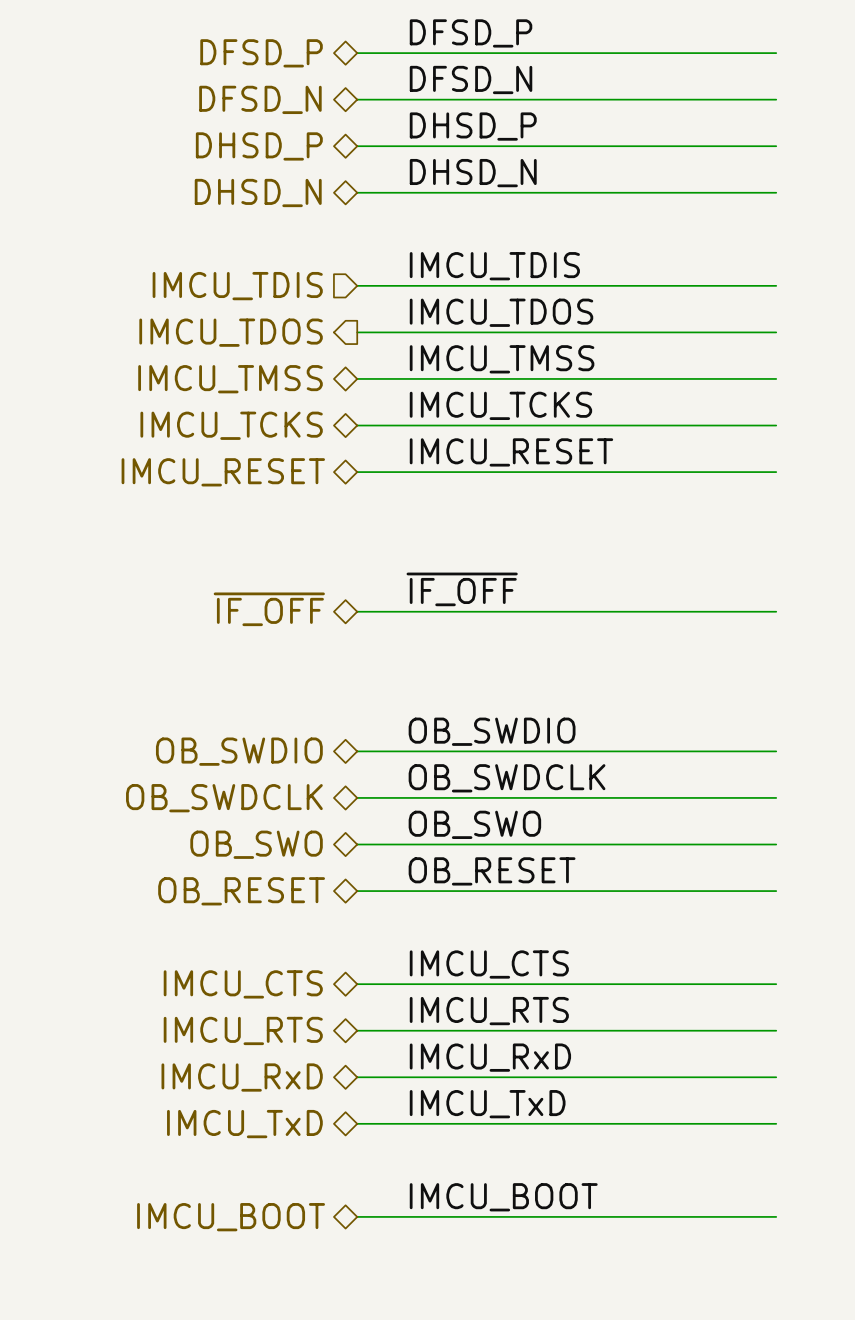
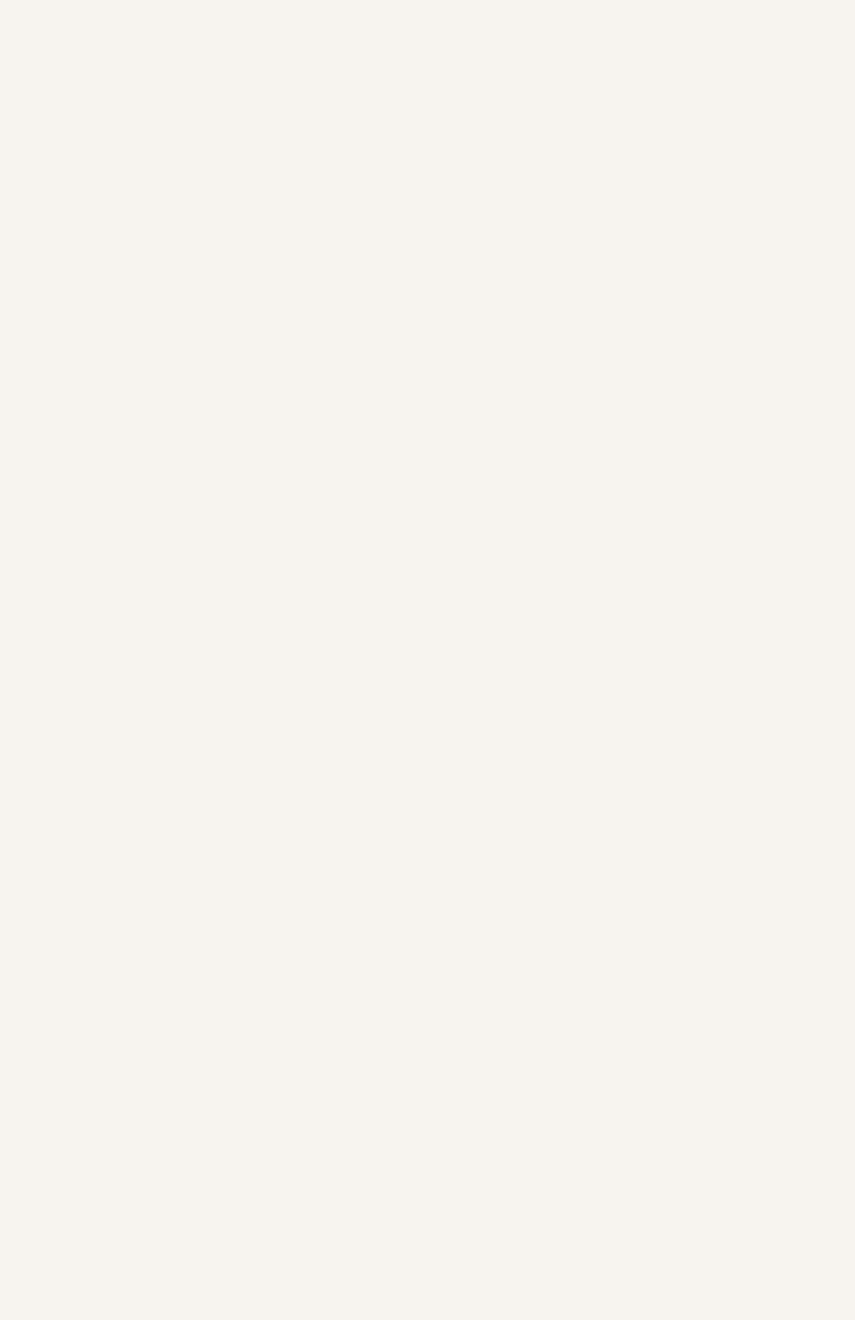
label: DFSD_P (471, 33) -> none
hierarchical label: DFSD_P (261, 53) -> none
wire: (357, 53) (776, 53) -> none
label: DFSD_N (471, 79) -> none
hierarchical label: DFSD_N (260, 99) -> none
wire: (357, 99) (776, 99) -> none
label: DHSD_P (473, 126) -> none
hierarchical label: DHSD_P (259, 146) -> none
wire: (357, 146) (776, 146) -> none
label: DHSD_N (473, 173) -> none
hierarchical label: DHSD_N (258, 192) -> none
wire: (357, 192) (776, 192) -> none
label: IMCU_TDIS (494, 266) -> none
wire: (357, 285) (776, 285) -> none
hierarchical label: IMCU_TDIS (237, 286) -> none
label: IMCU_TDOS (501, 312) -> none
hierarchical label: IMCU_TDOS (231, 332) -> none
wire: (357, 332) (776, 332) -> none
label: IMCU_TMSS (502, 359) -> none
wire: (357, 378) (776, 378) -> none
hierarchical label: IMCU_TMSS (230, 379) -> none
label: IMCU_TCKS (500, 405) -> none
hierarchical label: IMCU_TCKS (231, 425) -> none
wire: (357, 425) (776, 425) -> none
label: IMCU_RESET (511, 452) -> none
hierarchical label: IMCU_RESET (223, 472) -> none
wire: (357, 472) (776, 472) -> none
label: ~{IF_OFF} (462, 589) -> none
hierarchical label: ~{IF_OFF} (269, 609) -> none
wire: (357, 611) (776, 611) -> none
label: OB_SWDIO (492, 731) -> none
hierarchical label: OB_SWDIO (239, 751) -> none
wire: (357, 751) (776, 751) -> none
label: OB_SWDCLK (507, 778) -> none
wire: (357, 797) (776, 797) -> none
hierarchical label: OB_SWDCLK (224, 798) -> none
label: OB_SWO (474, 824) -> none
hierarchical label: OB_SWO (256, 844) -> none
wire: (357, 844) (776, 844) -> none
label: OB_RESET (492, 871) -> none
hierarchical label: OB_RESET (241, 891) -> none
wire: (357, 891) (776, 891) -> none
label: IMCU_CTS (489, 964) -> none
hierarchical label: IMCU_CTS (243, 984) -> none
wire: (357, 984) (776, 984) -> none
label: IMCU_RTS (489, 1011) -> none
hierarchical label: IMCU_RTS (243, 1030) -> none
wire: (357, 1030) (776, 1030) -> none
label: IMCU_RxD (490, 1057) -> none
hierarchical label: IMCU_RxD (242, 1077) -> none
wire: (357, 1077) (776, 1077) -> none
label: IMCU_TxD (487, 1104) -> none
wire: (357, 1123) (776, 1123) -> none
hierarchical label: IMCU_TxD (244, 1124) -> none
label: IMCU_BOOT (503, 1197) -> none
wire: (357, 1216) (776, 1216) -> none
hierarchical label: IMCU_BOOT (231, 1217) -> none

